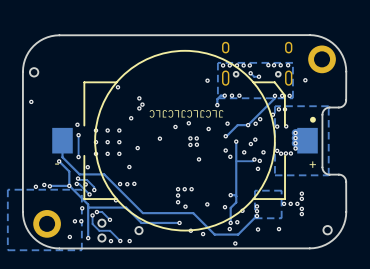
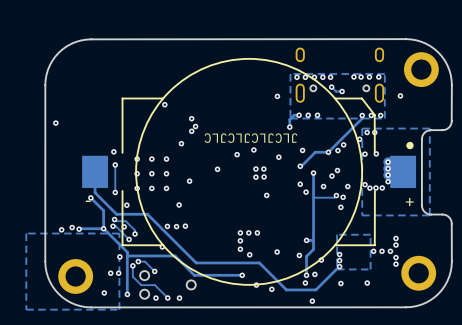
part: (34, 72) -> none
part: none -> (418, 273)
part: (327, 230) -> none

